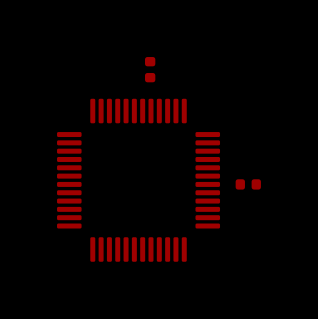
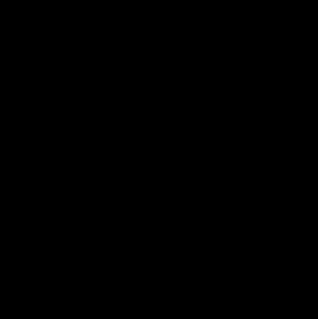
part: (150, 69) -> none
part: (138, 180) -> none
part: (248, 184) -> none

